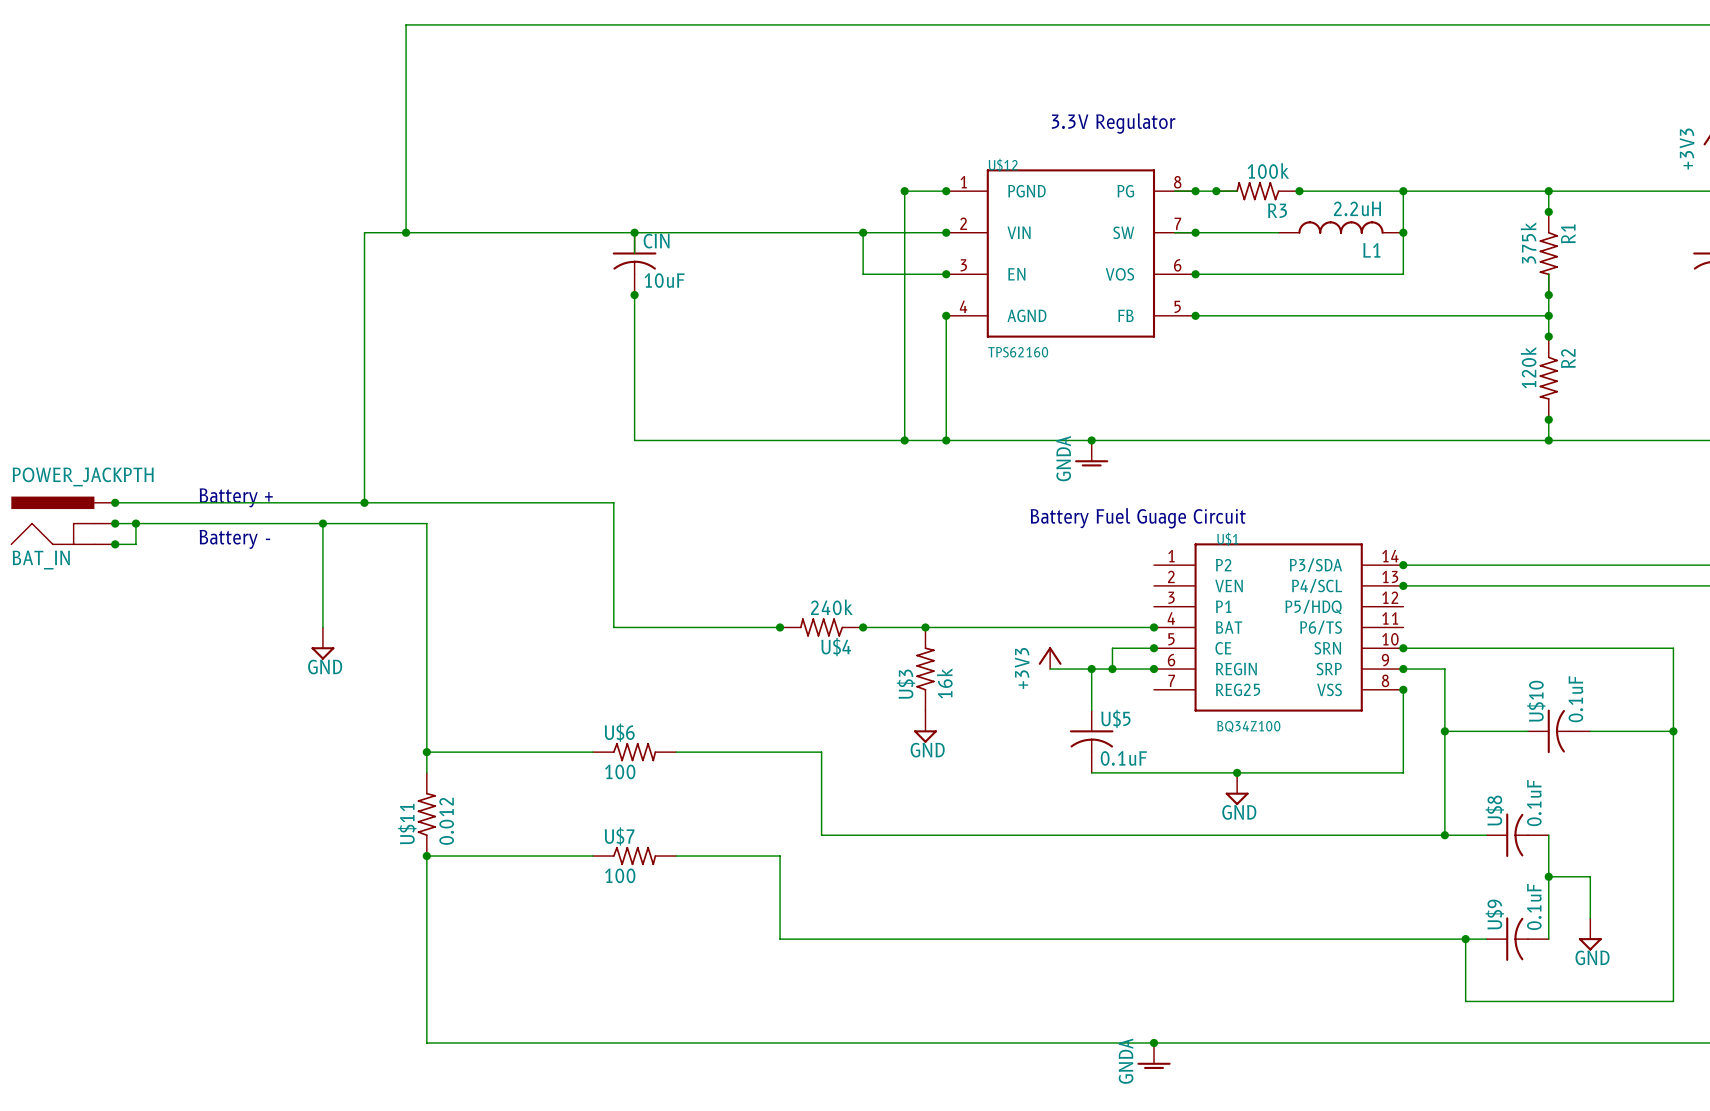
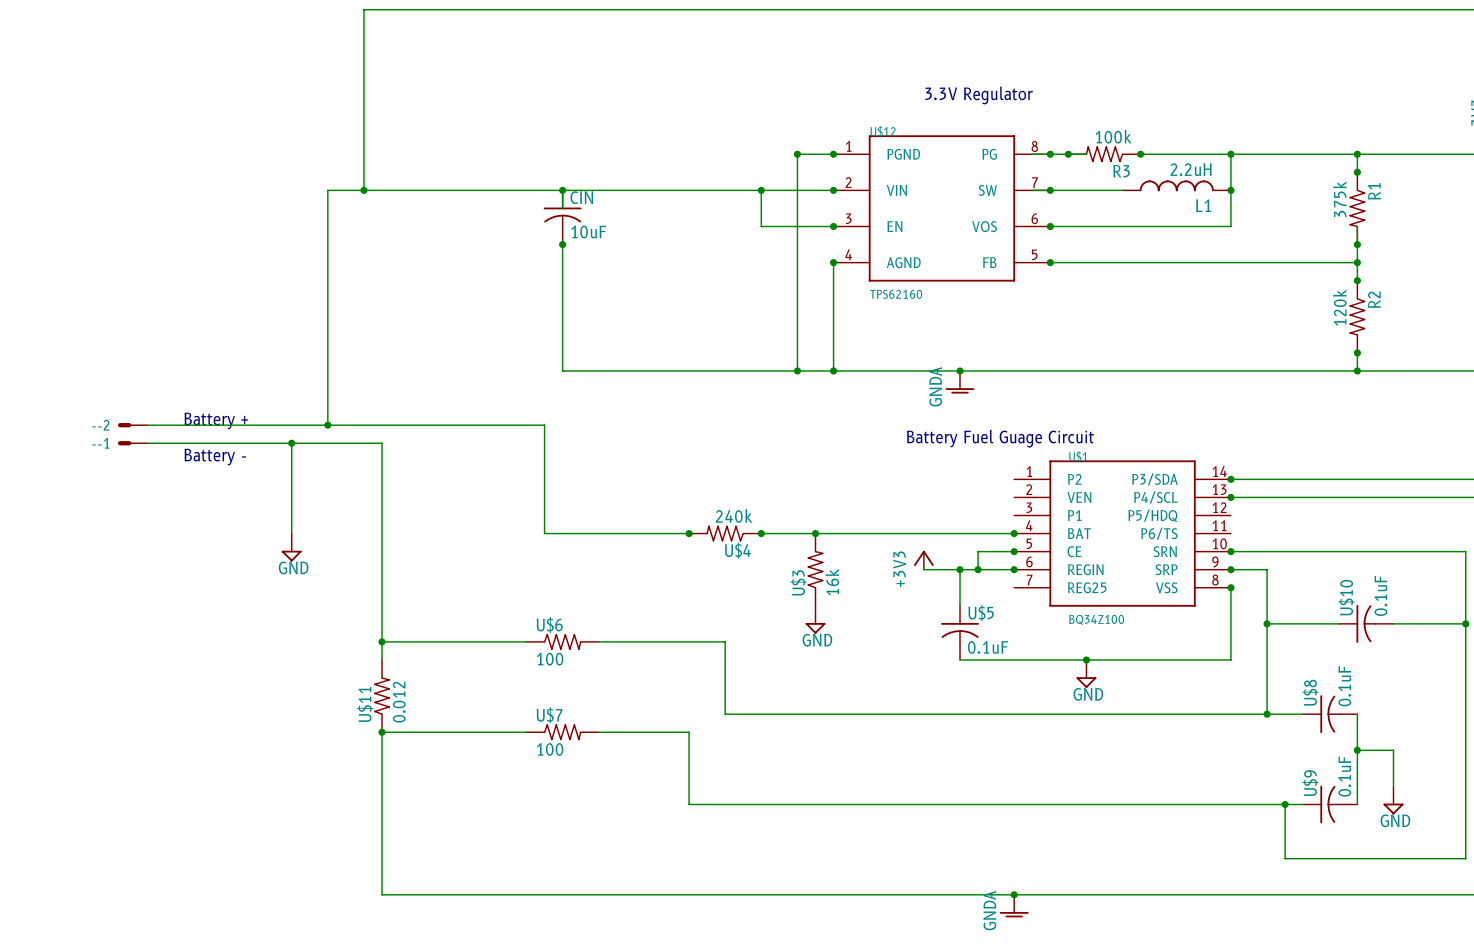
junction: (115, 502) -> none
--2: none -> (132, 425)
BAT_IN: POWER_JACKPTH (62, 520) -> none
junction: (115, 523) -> none
wire: (135, 523) (135, 544) (115, 544) -> none
junction: (135, 523) -> none
--1: none -> (132, 443)
junction: (115, 544) -> none

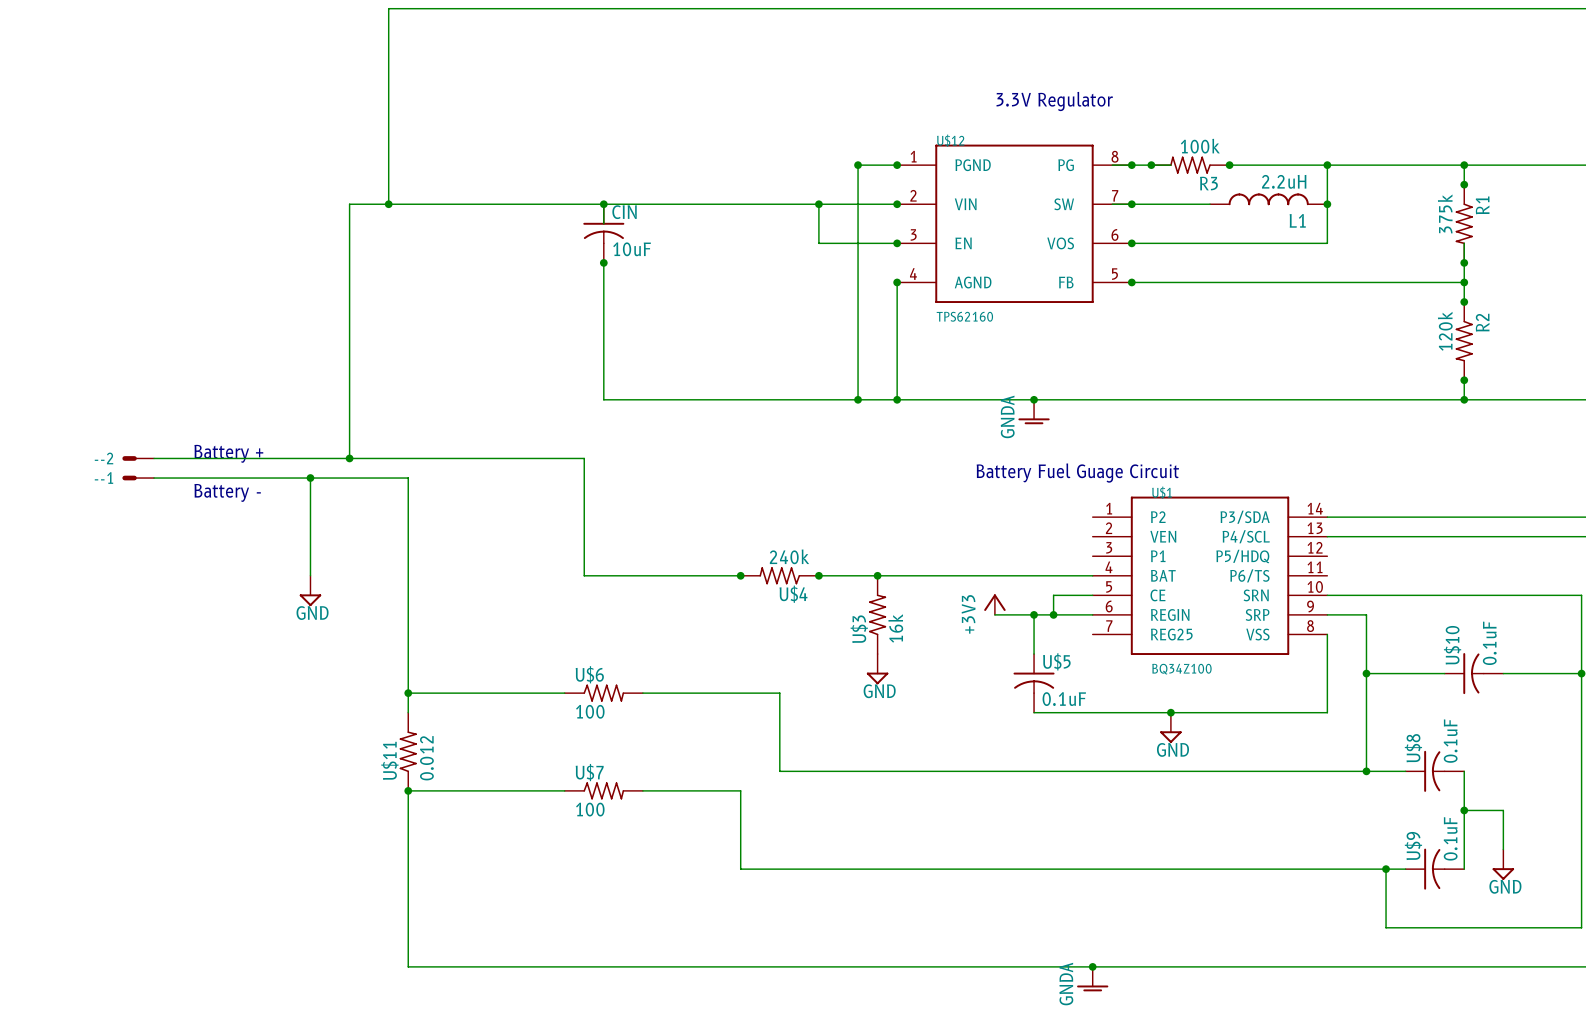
junction: (1230, 479) -> none
junction: (1230, 497) -> none
junction: (1014, 533) -> none
junction: (1014, 551) -> none
junction: (1230, 551) -> none
junction: (1014, 569) -> none
junction: (1230, 569) -> none
junction: (1230, 587) -> none

